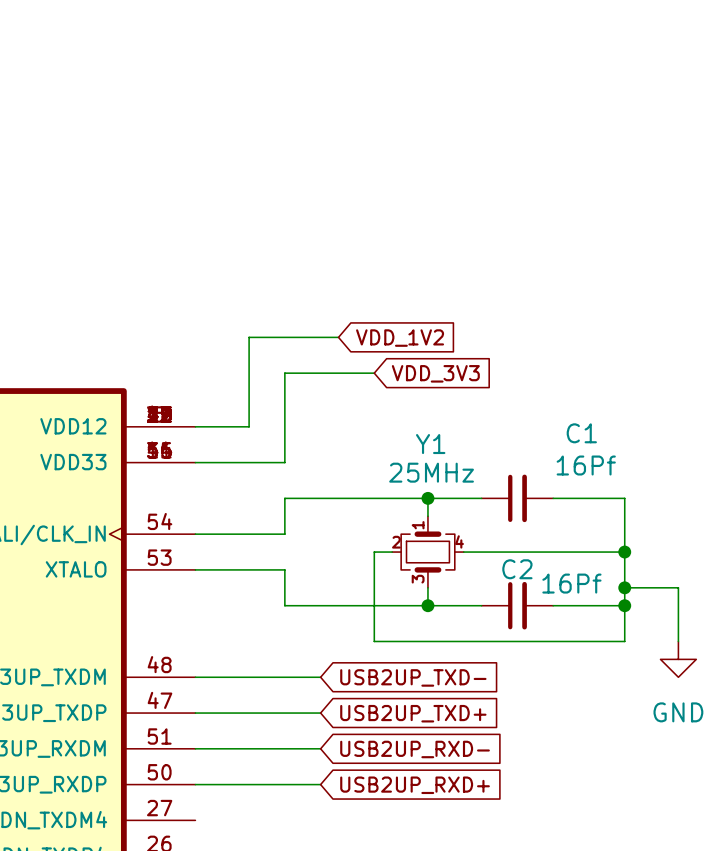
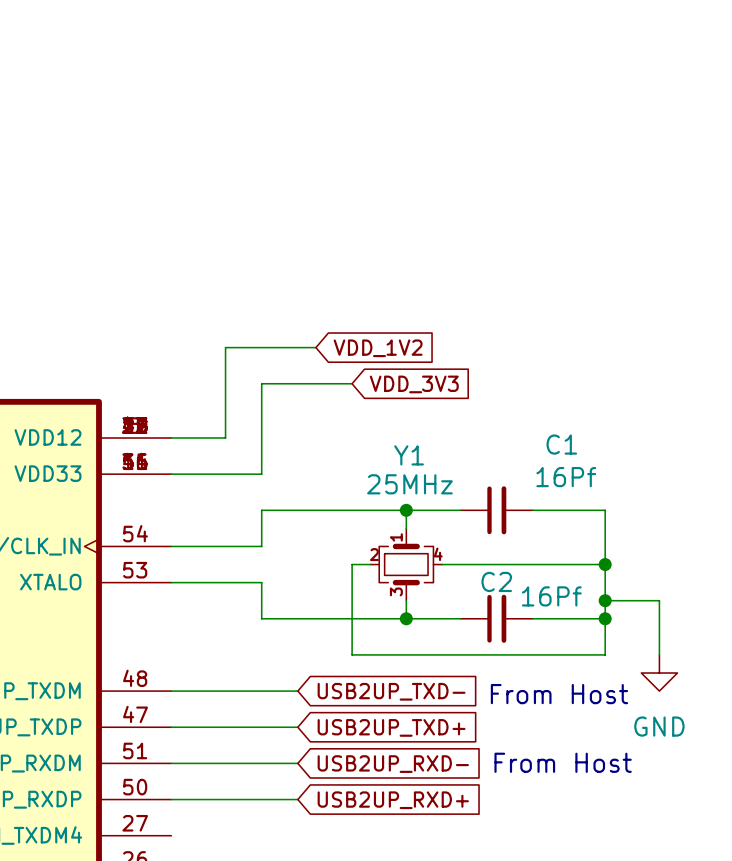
text: none -> From Host (559, 694)
text: none -> From Host (563, 762)

